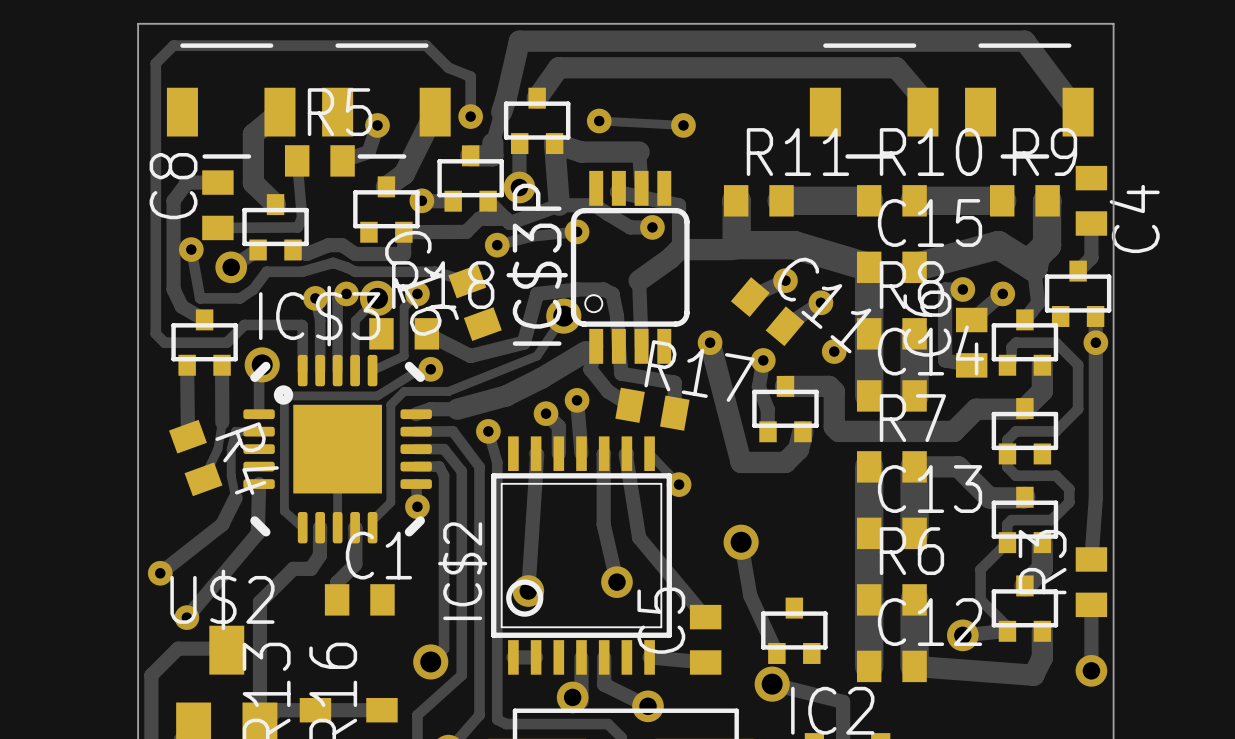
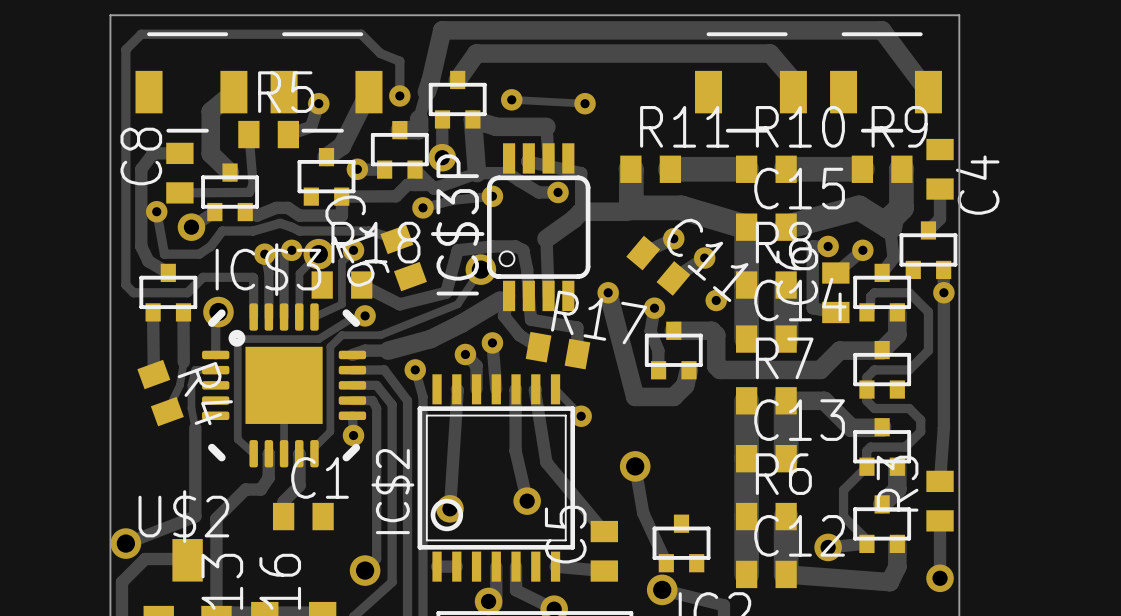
track: (259, 484) (257, 533) (186, 617) -> none
track: (235, 497) (222, 524) (160, 573) -> (195, 427) (195, 516) (125, 543)
via: (160, 573) -> none
via: (186, 617) -> none
via: none -> (125, 543)

